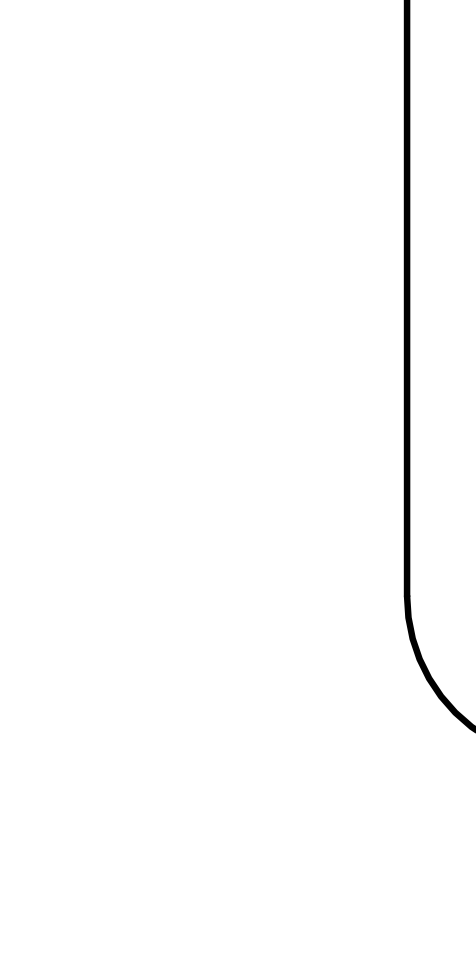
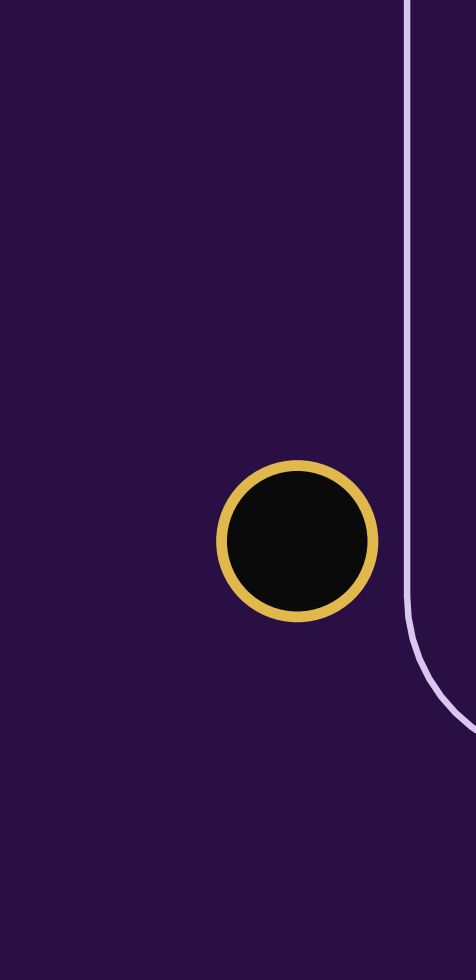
part: none -> (297, 541)

